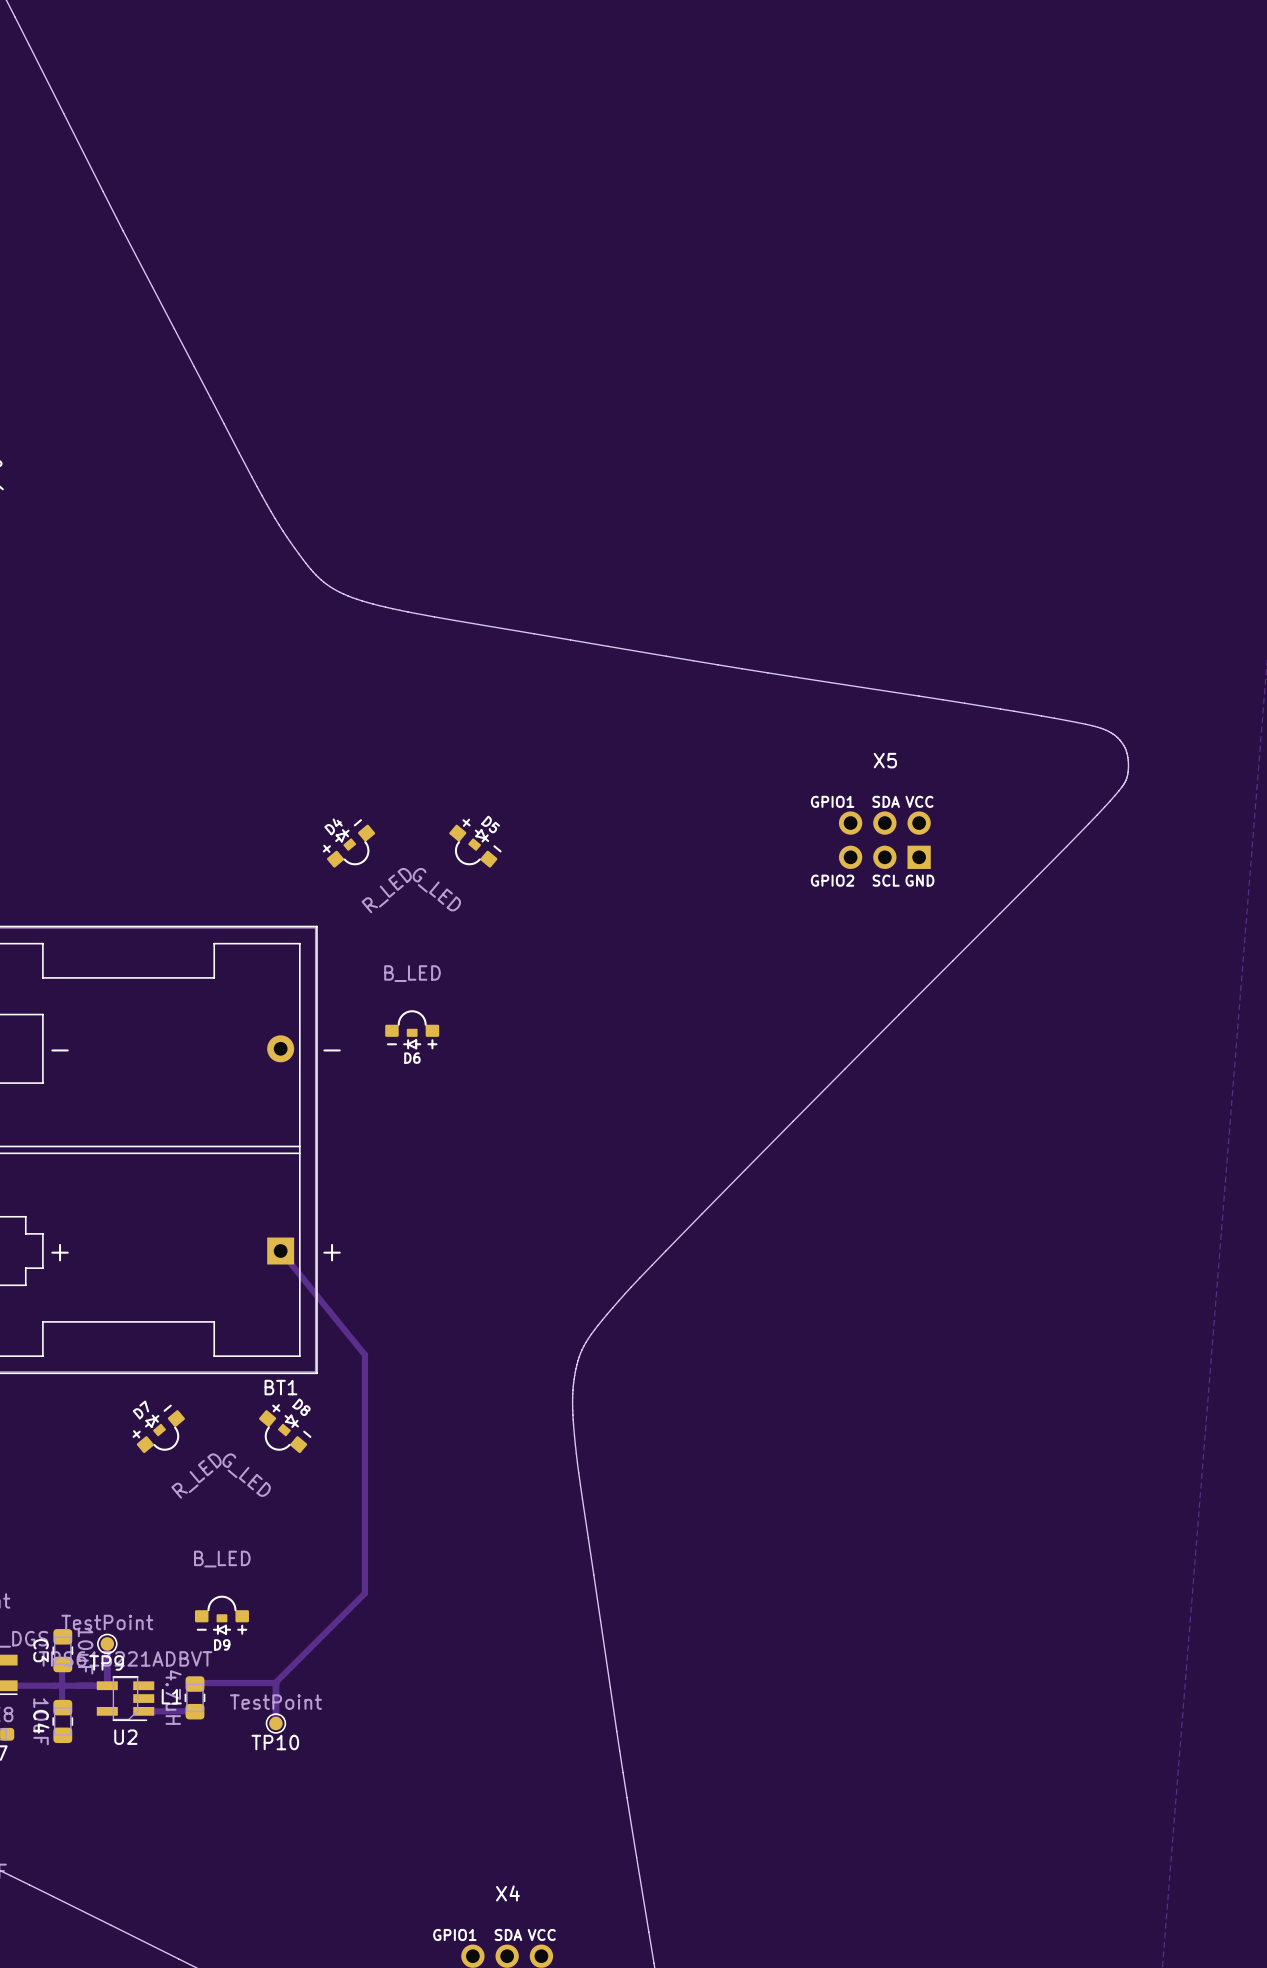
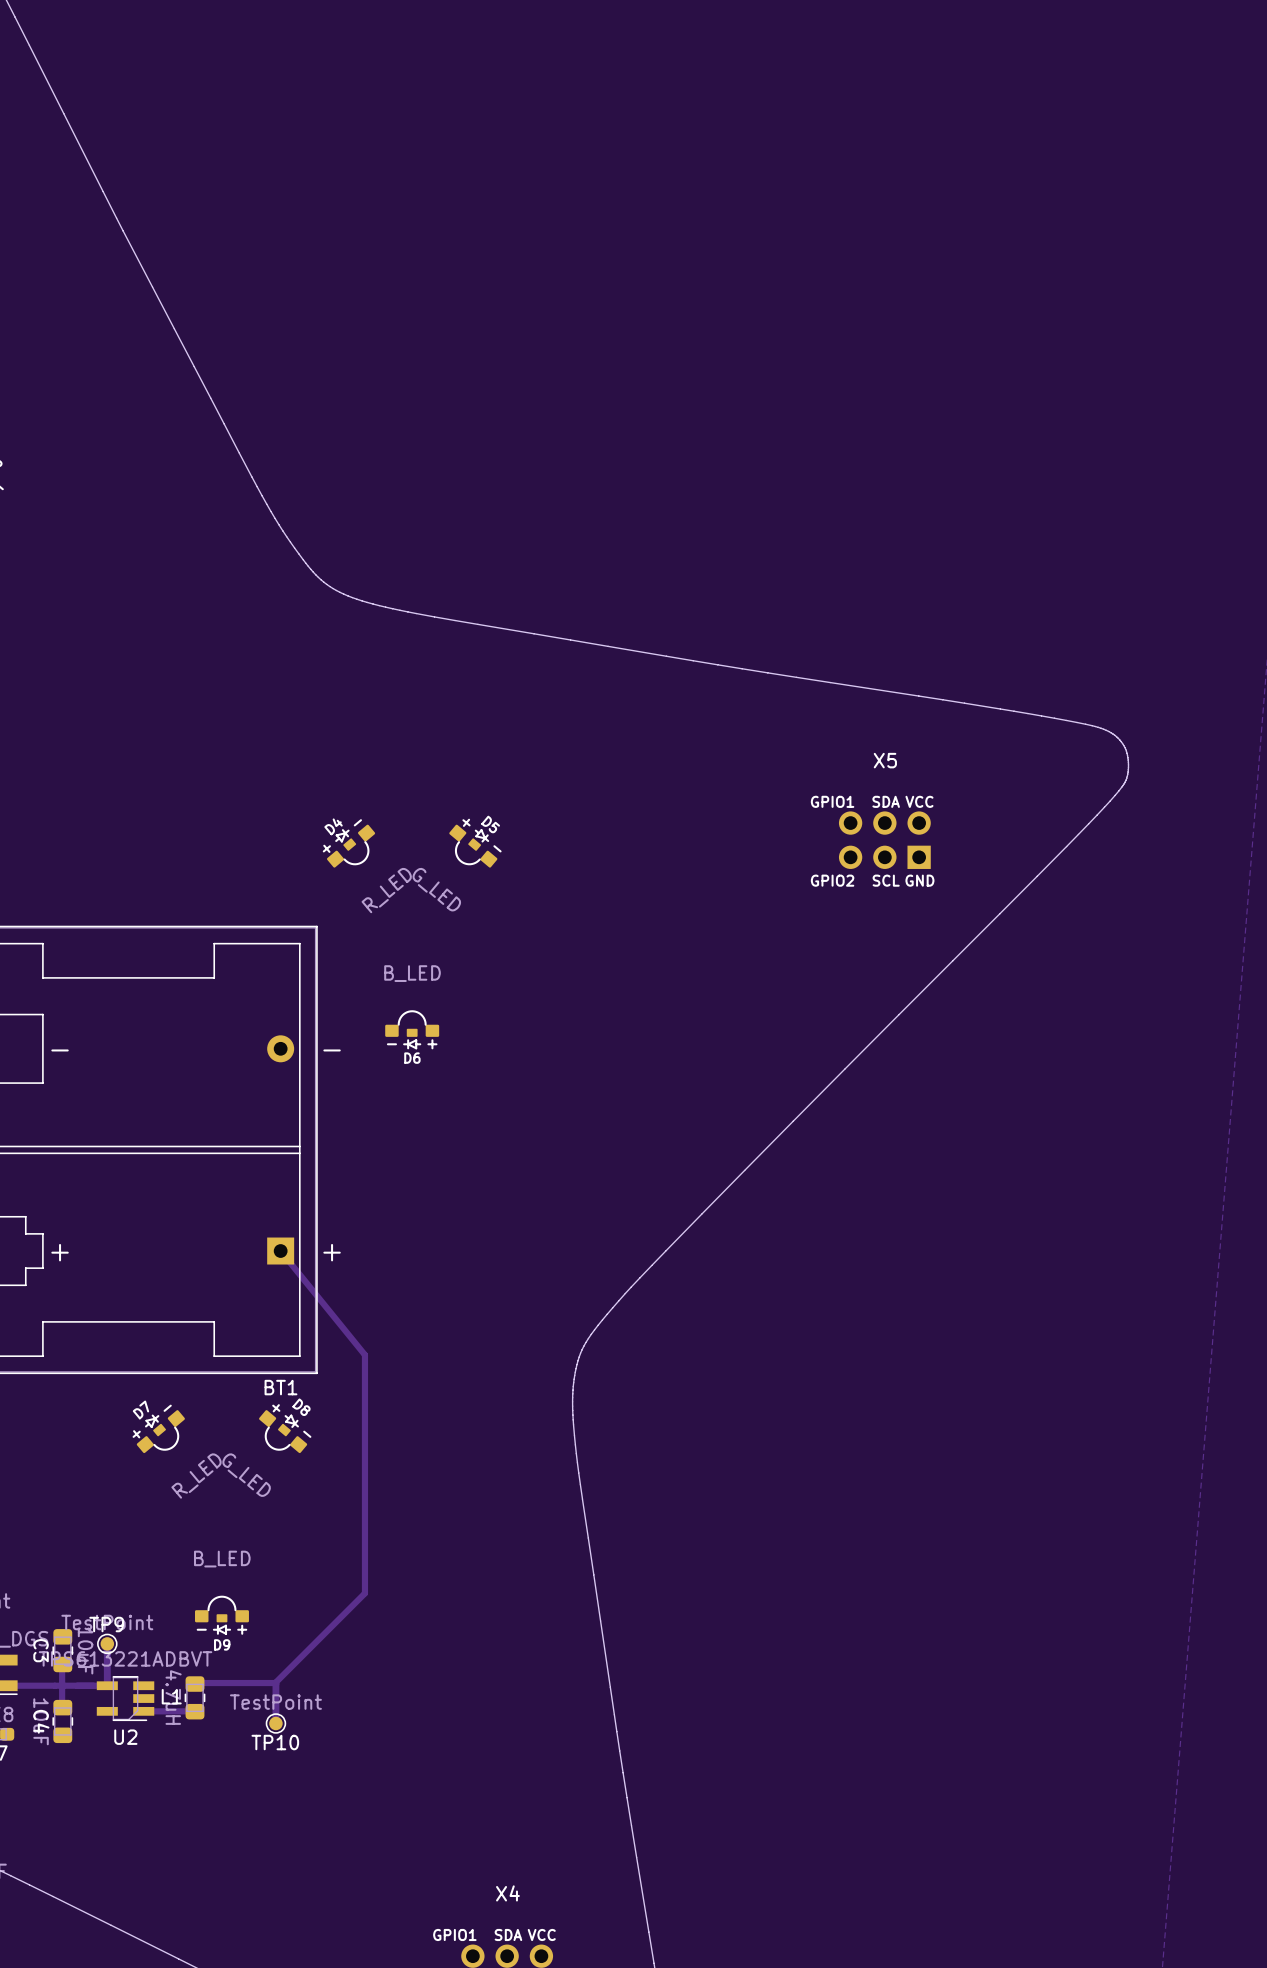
TP9 name position: TP9 (106, 1662) -> TP9 (106, 1624)

